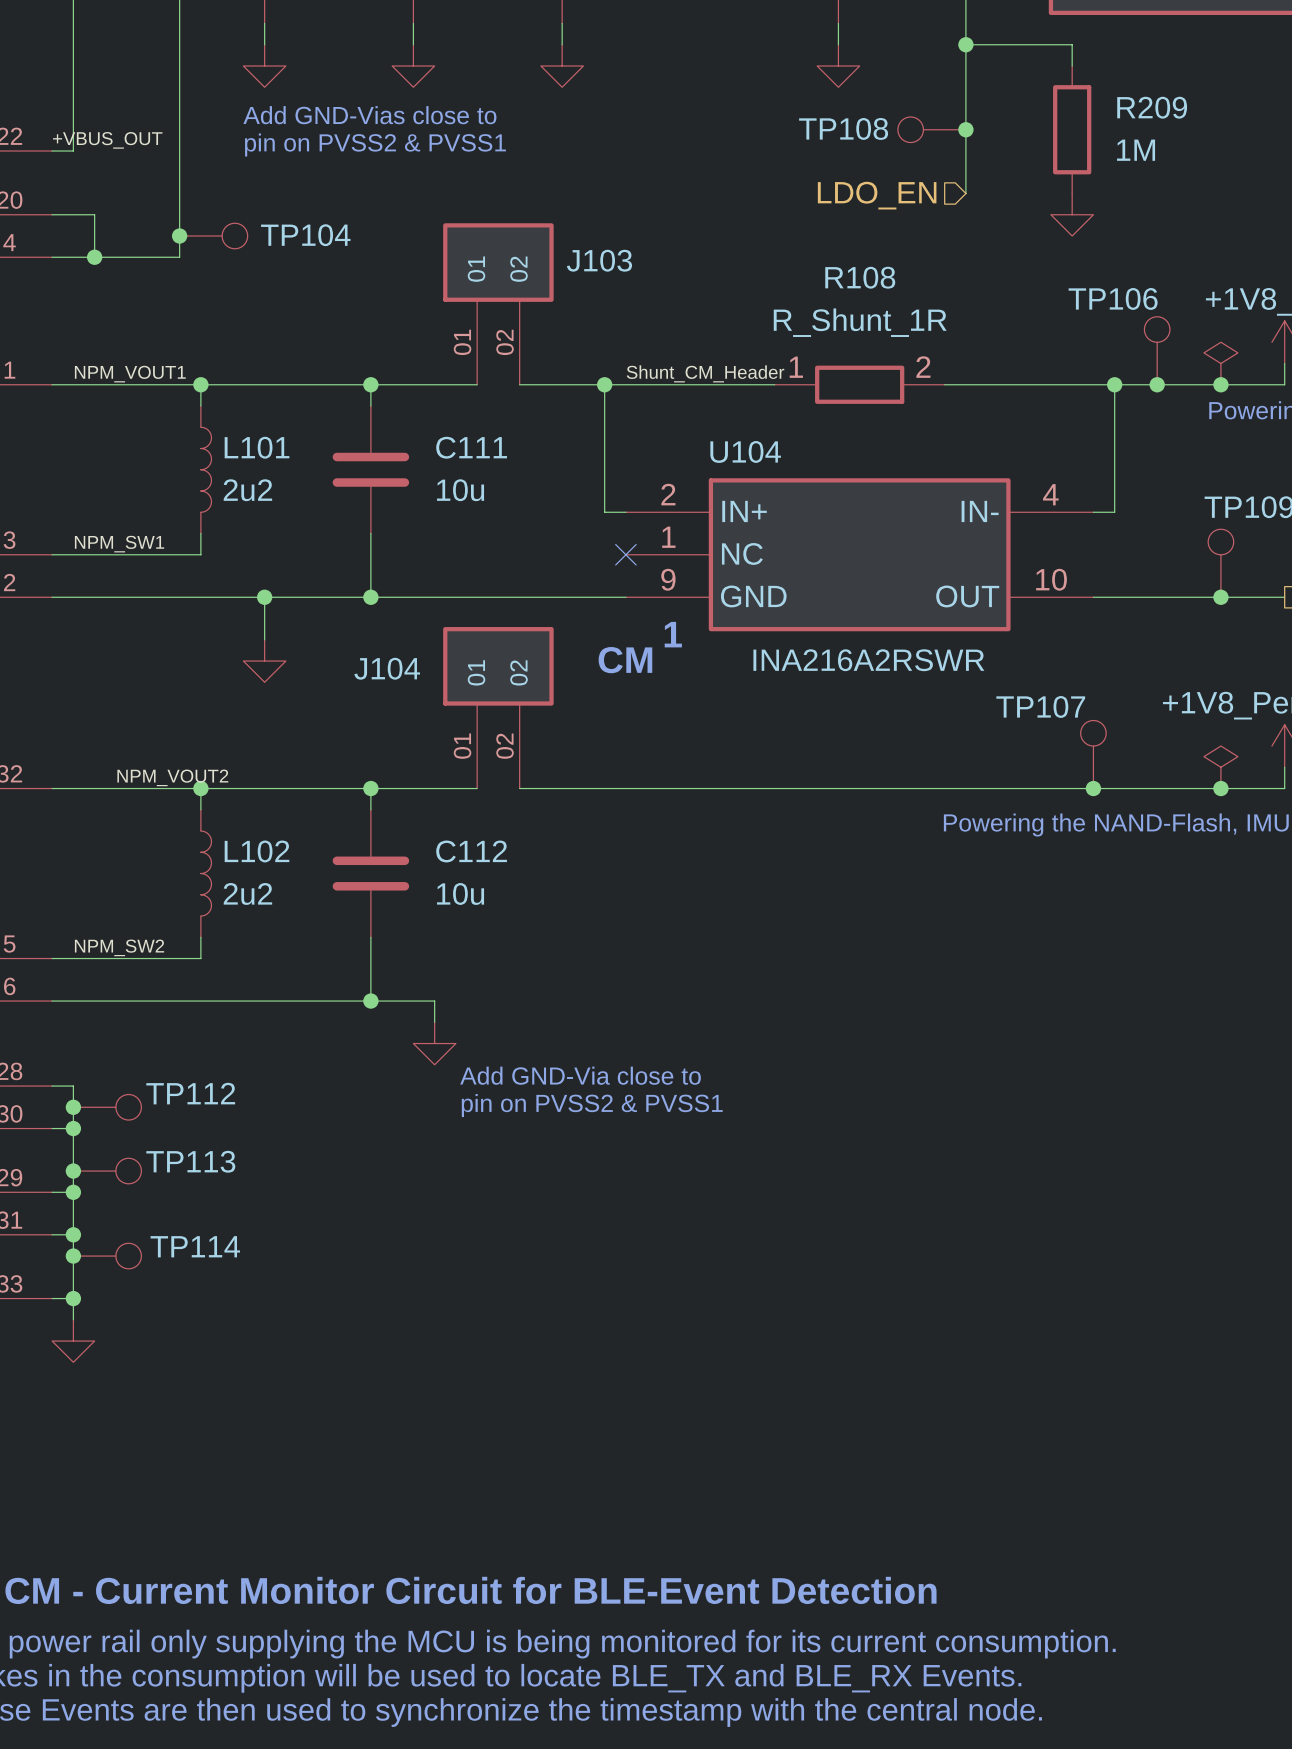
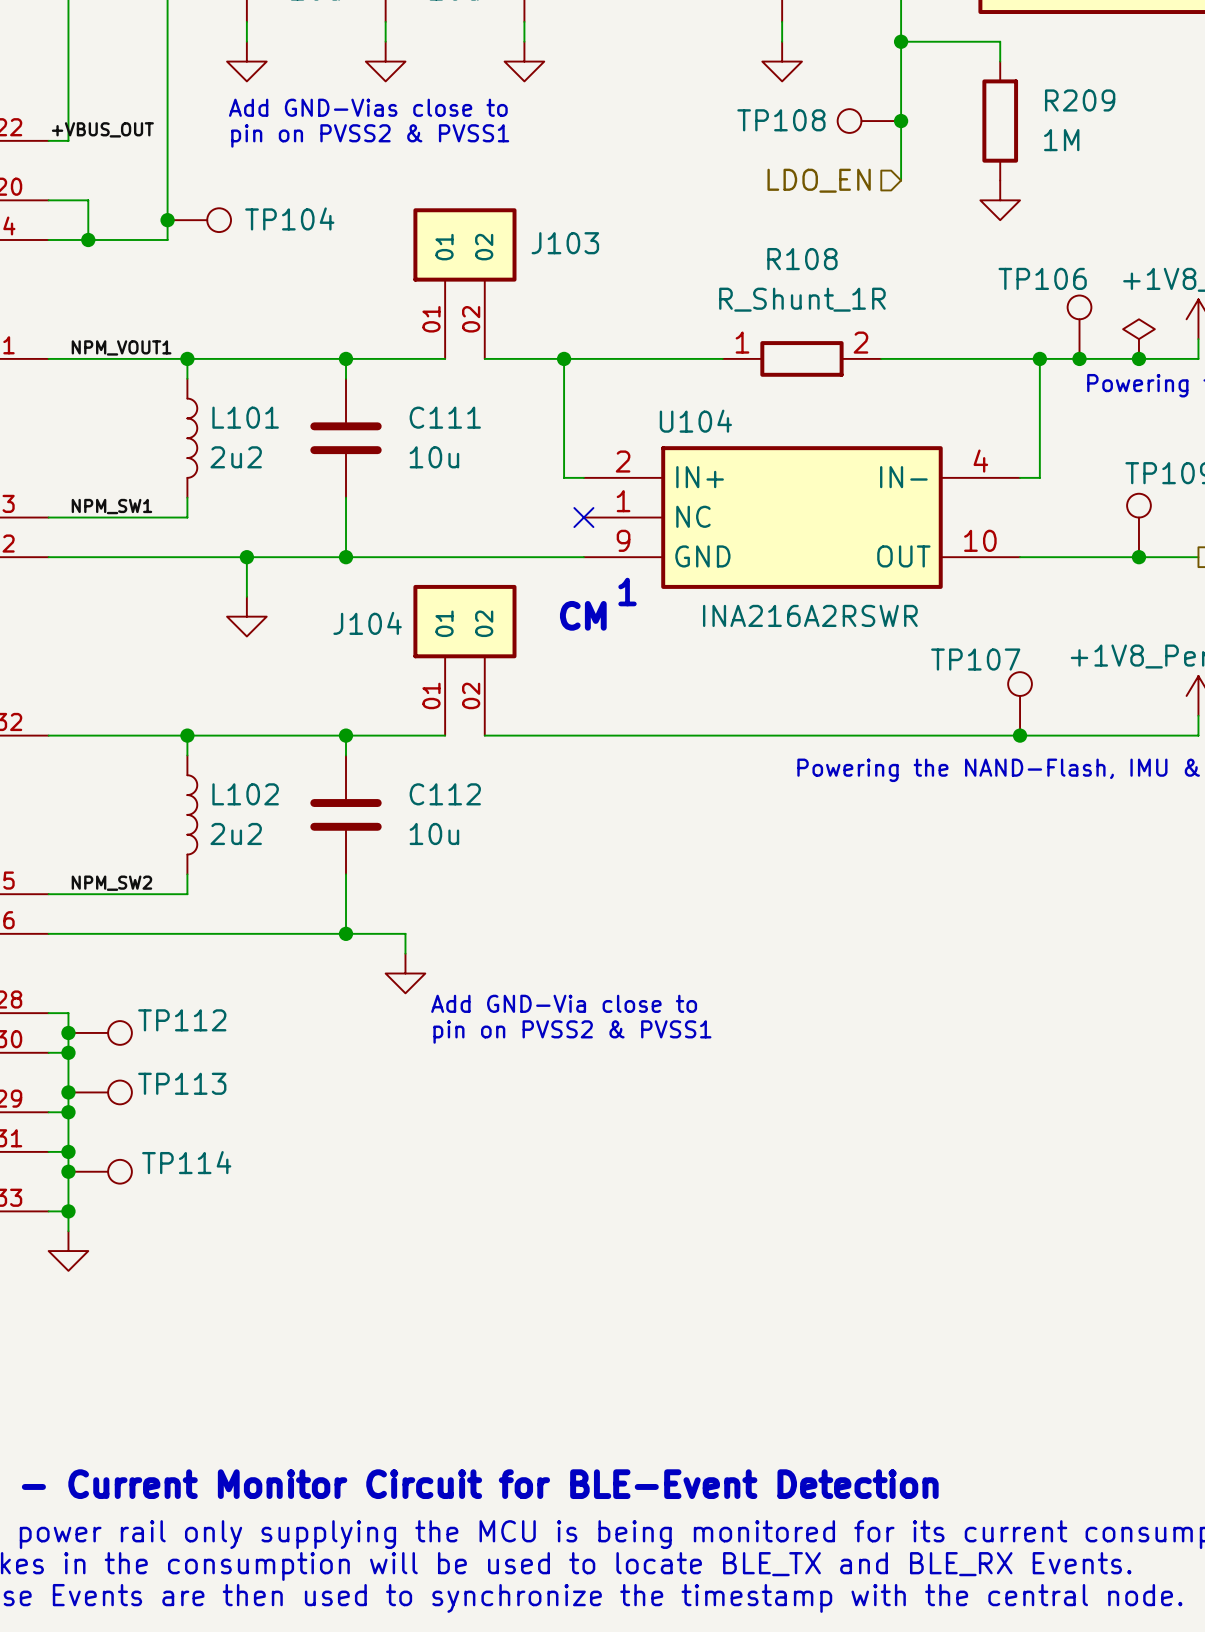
label: Shunt_CM_Header (705, 373) -> none
power symbol: (1220, 767) -> none
label: NPM_VOUT2 (172, 777) -> none
junction: (1220, 788) -> none

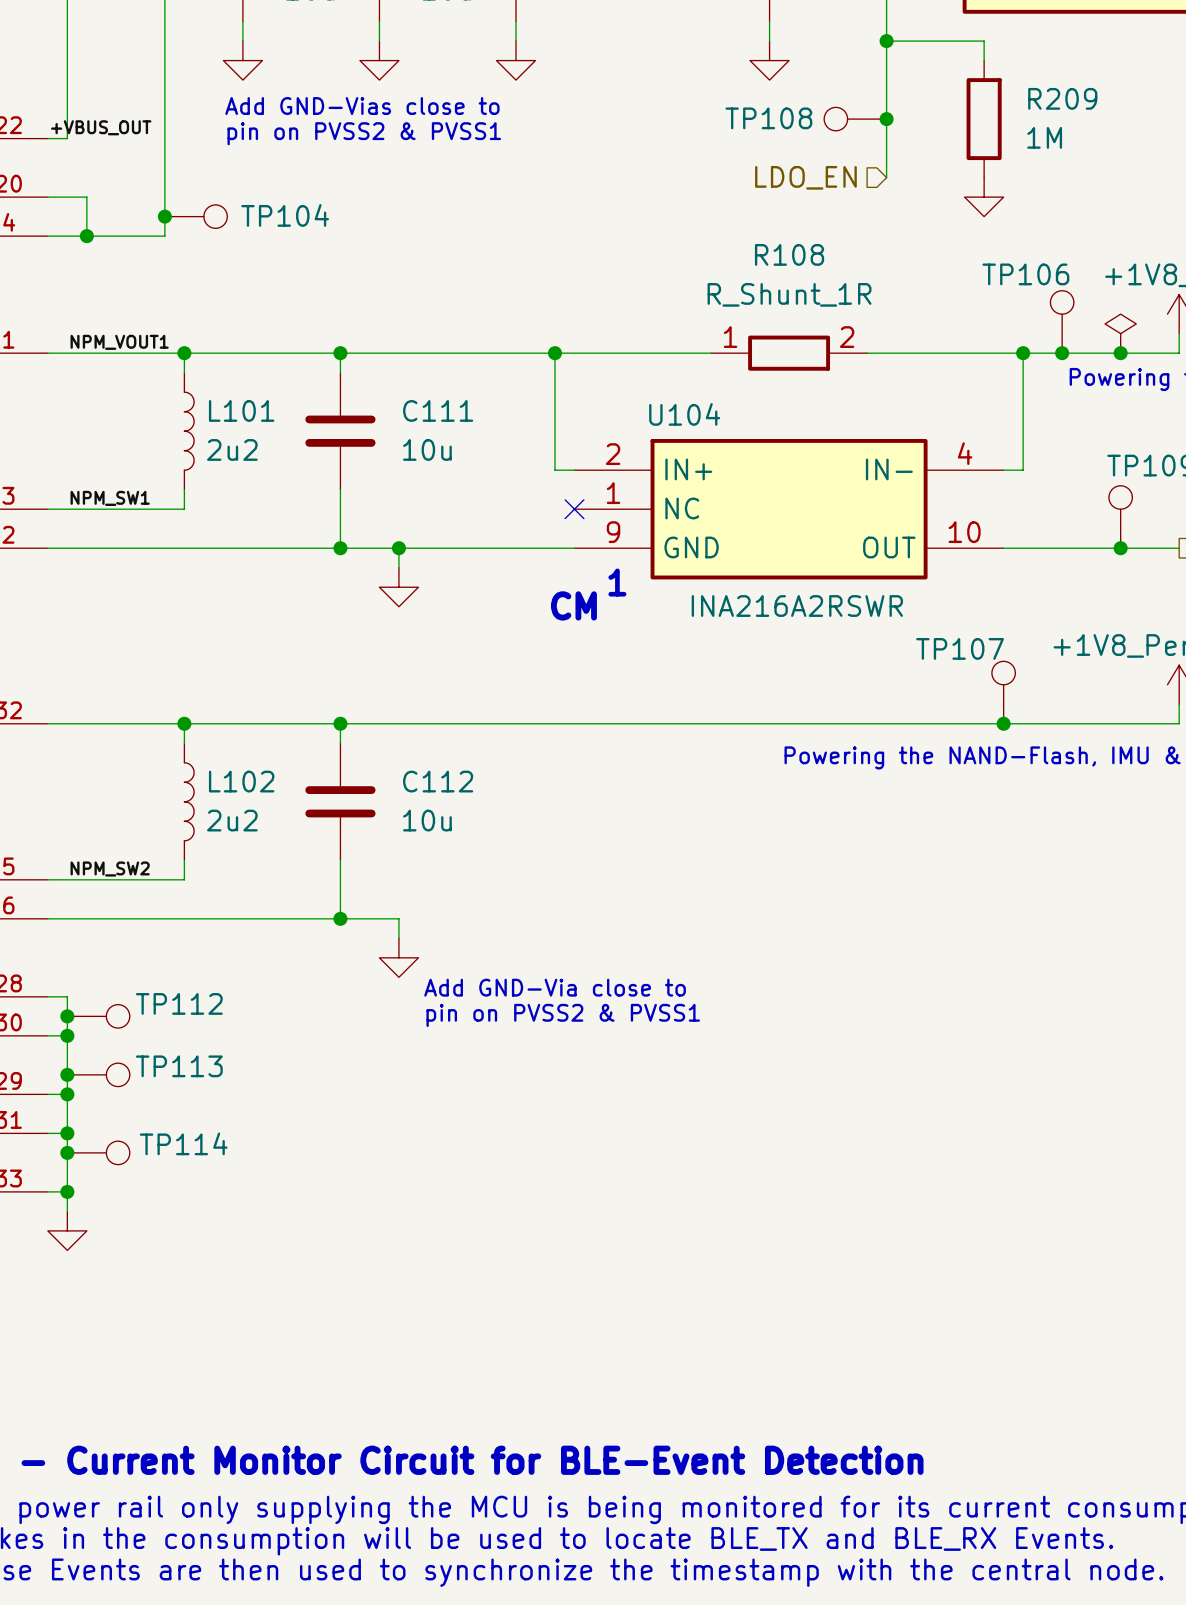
J103: (464, 283) -> none
wire: none -> (437, 353) (476, 353)
wire: (246, 557) (246, 596) -> none
junction: (246, 557) -> none
wire: none -> (398, 548) (398, 567)
junction: none -> (398, 548)
power symbol position: (246, 616) -> (398, 587)
J104: (464, 660) -> none
wire: none -> (437, 723) (476, 723)

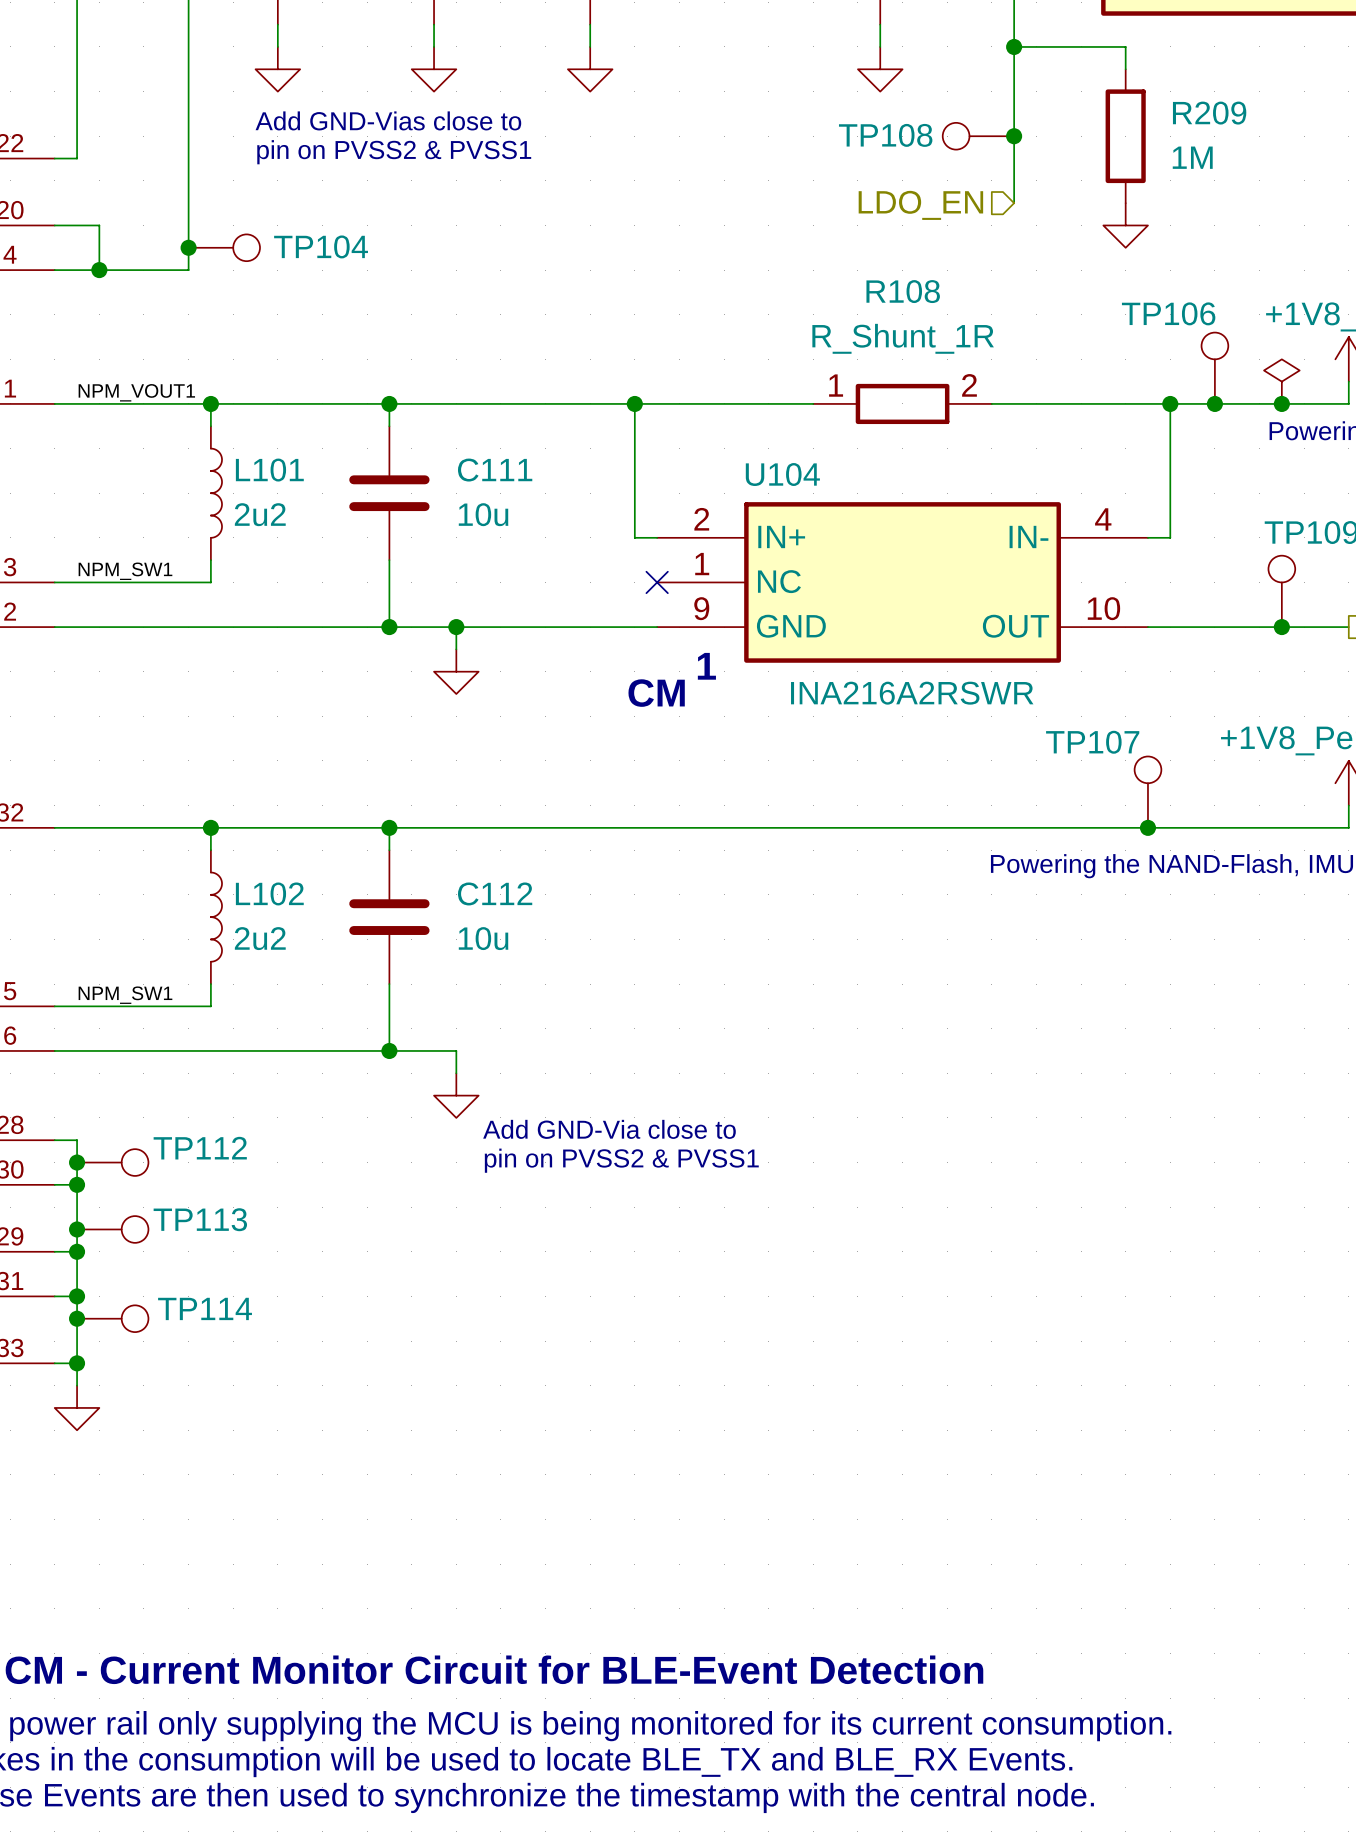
label: +VBUS_OUT (101, 127) -> none
label: NPM_SW2 (110, 868) -> NPM_SW1 (125, 995)

